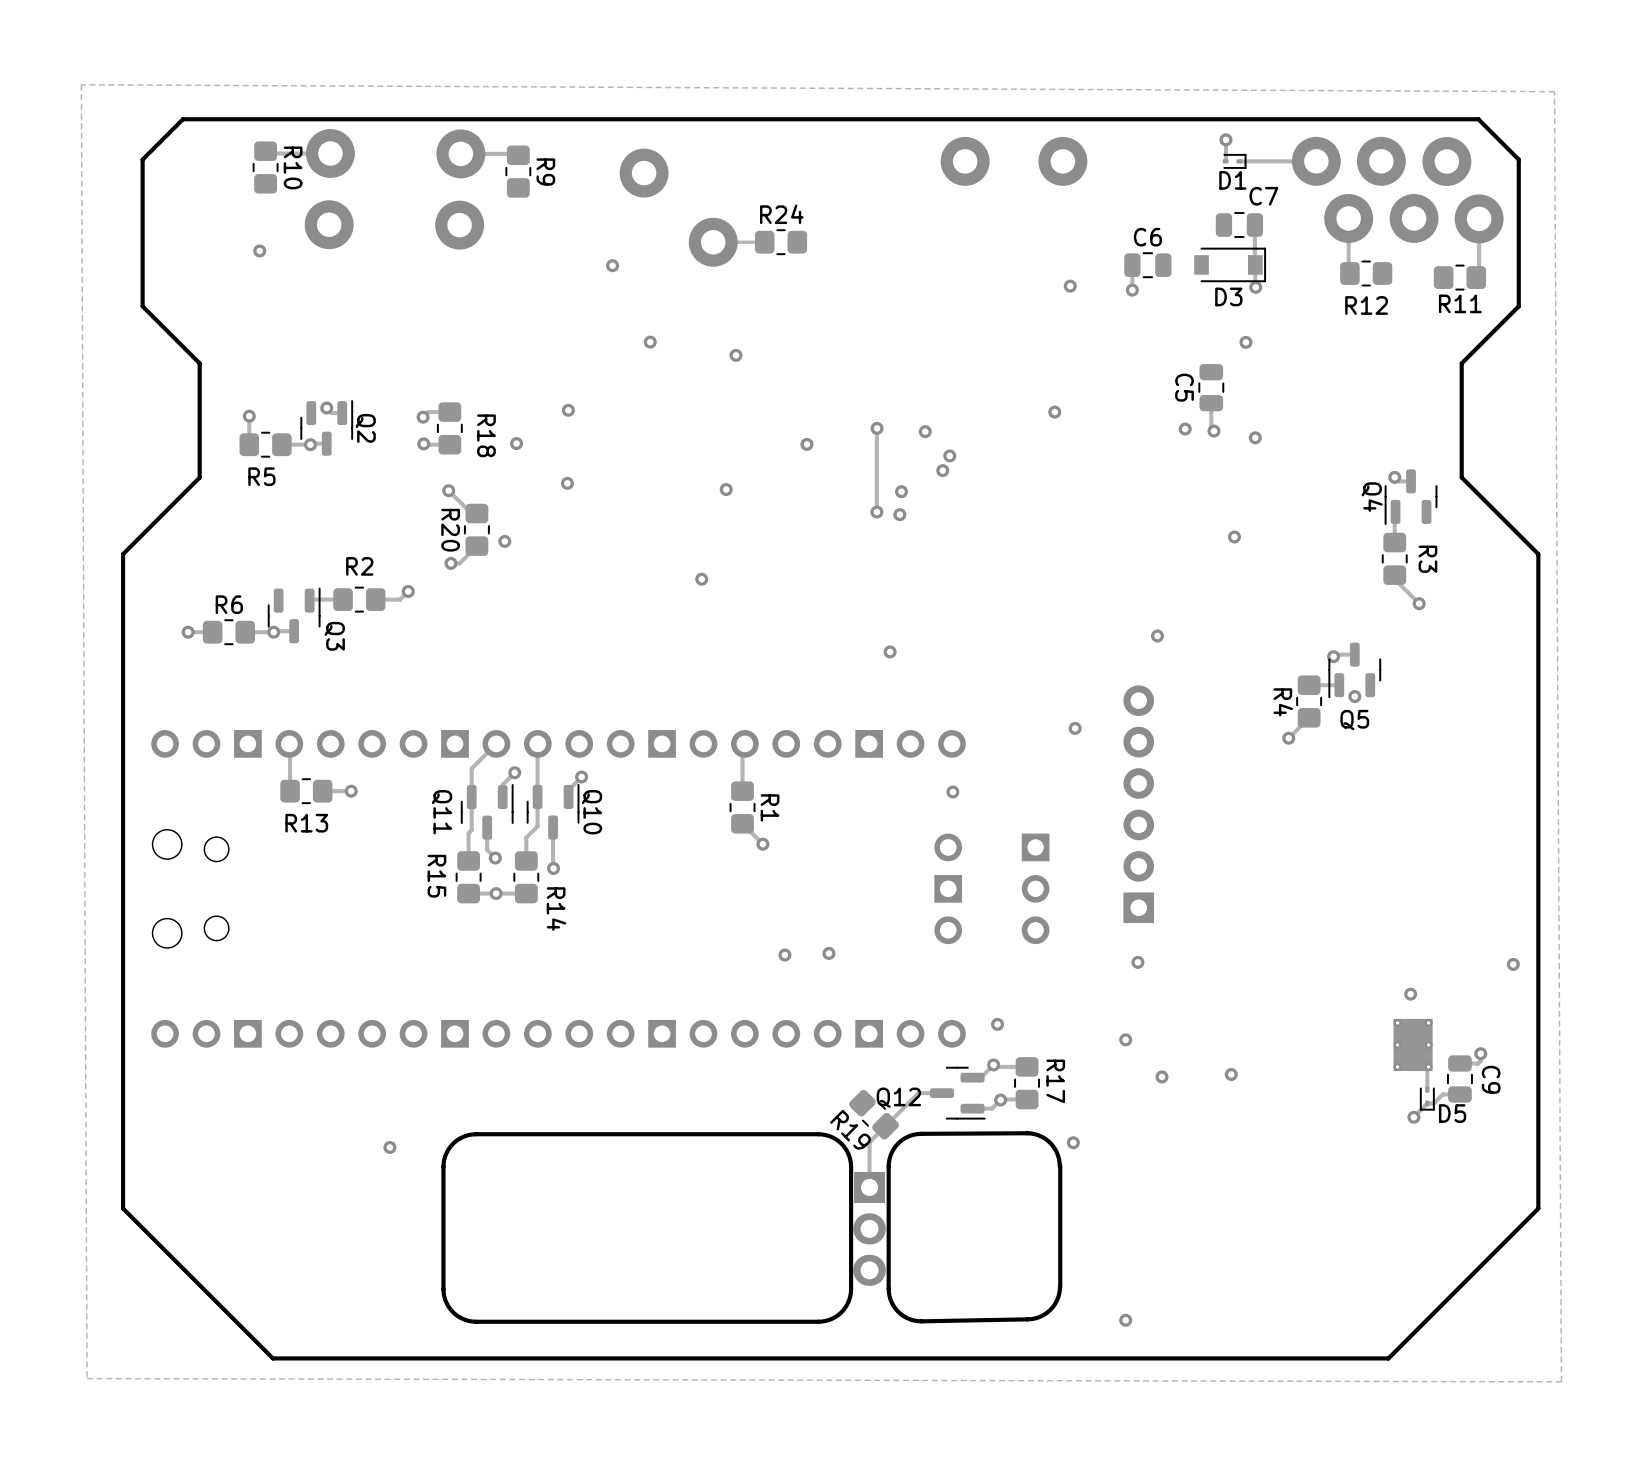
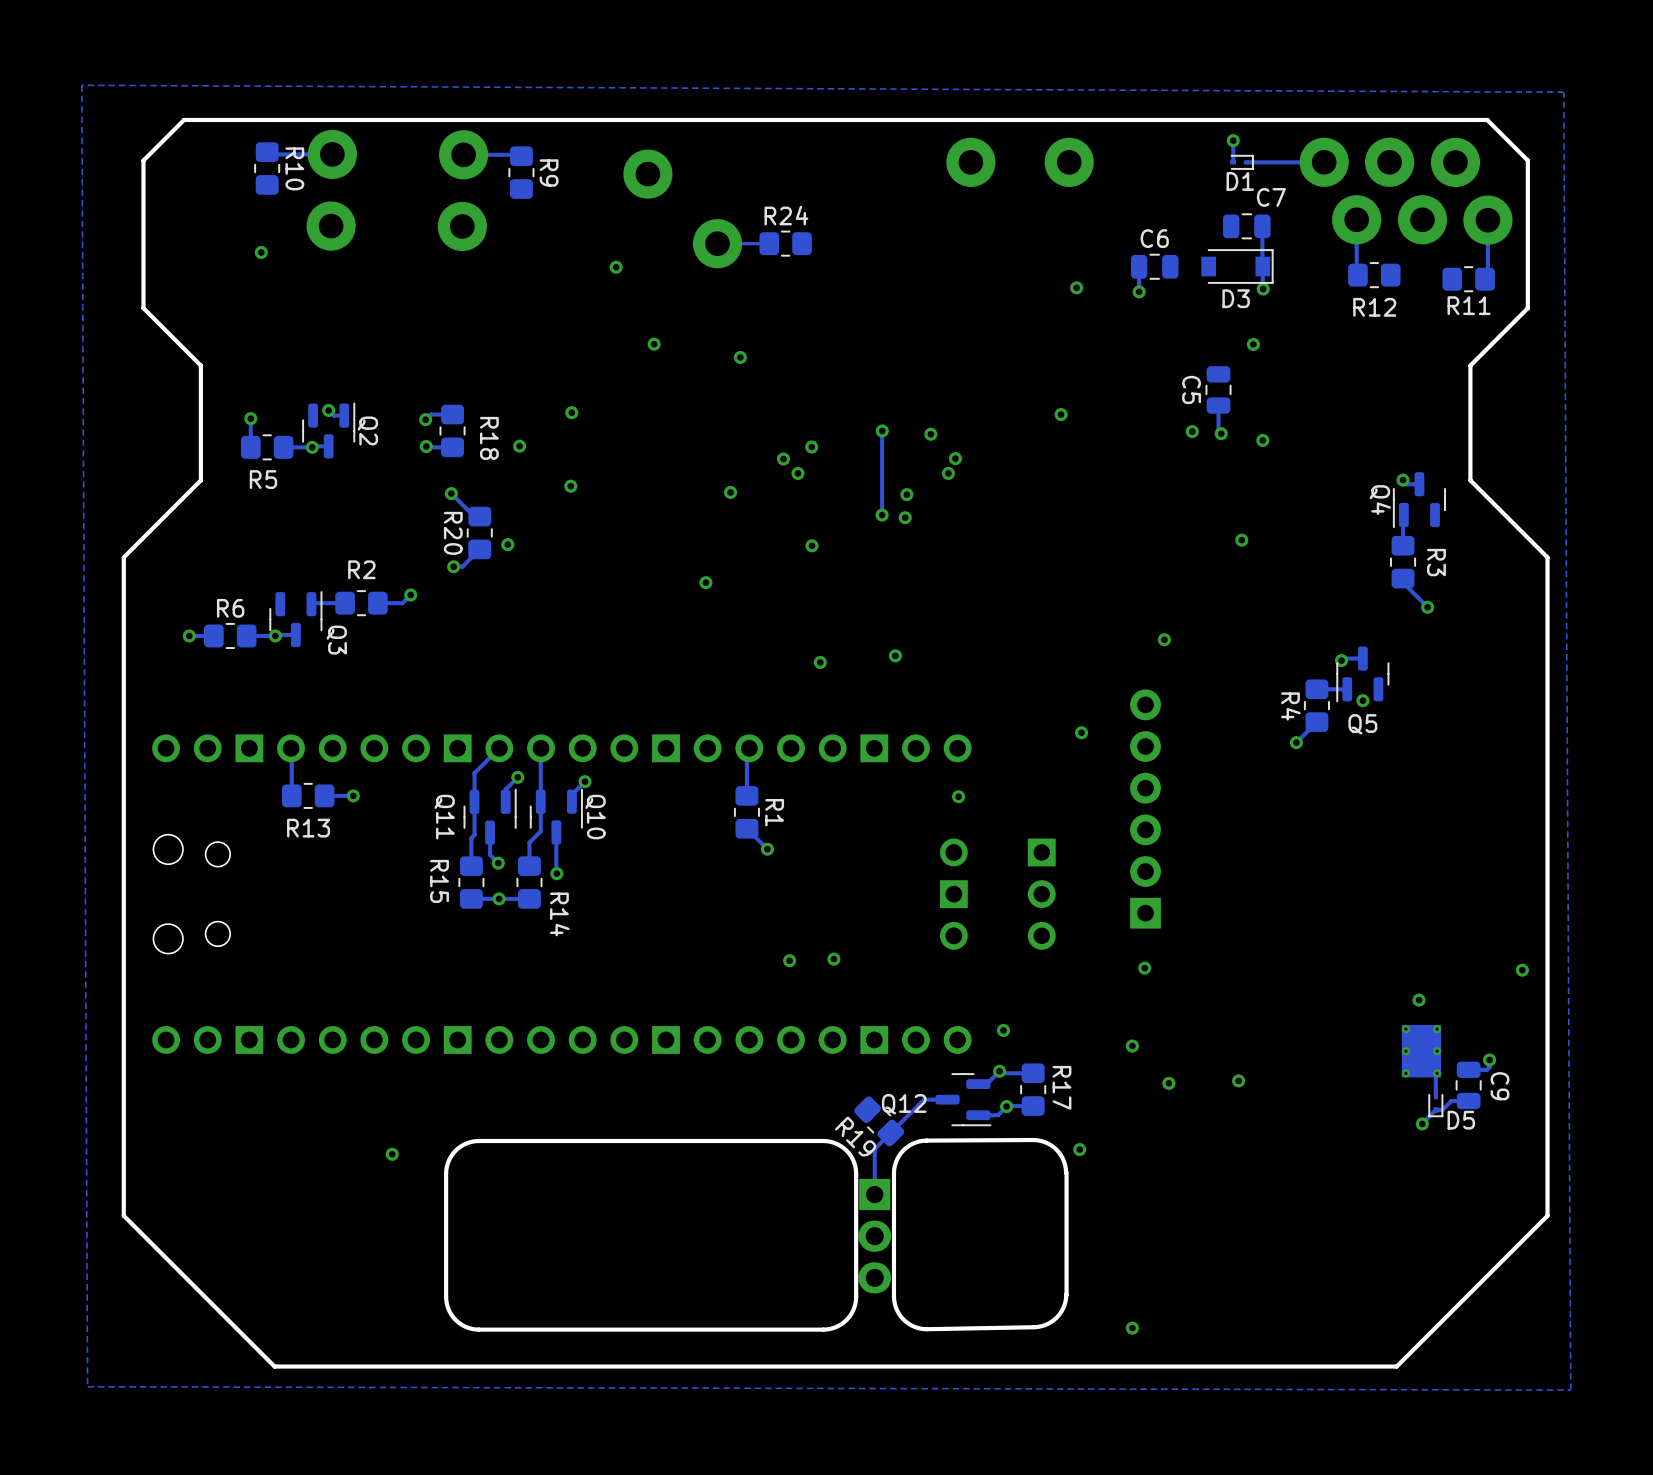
via: none -> (783, 459)
via: none -> (797, 473)
via: none -> (812, 545)
via: none -> (820, 662)

